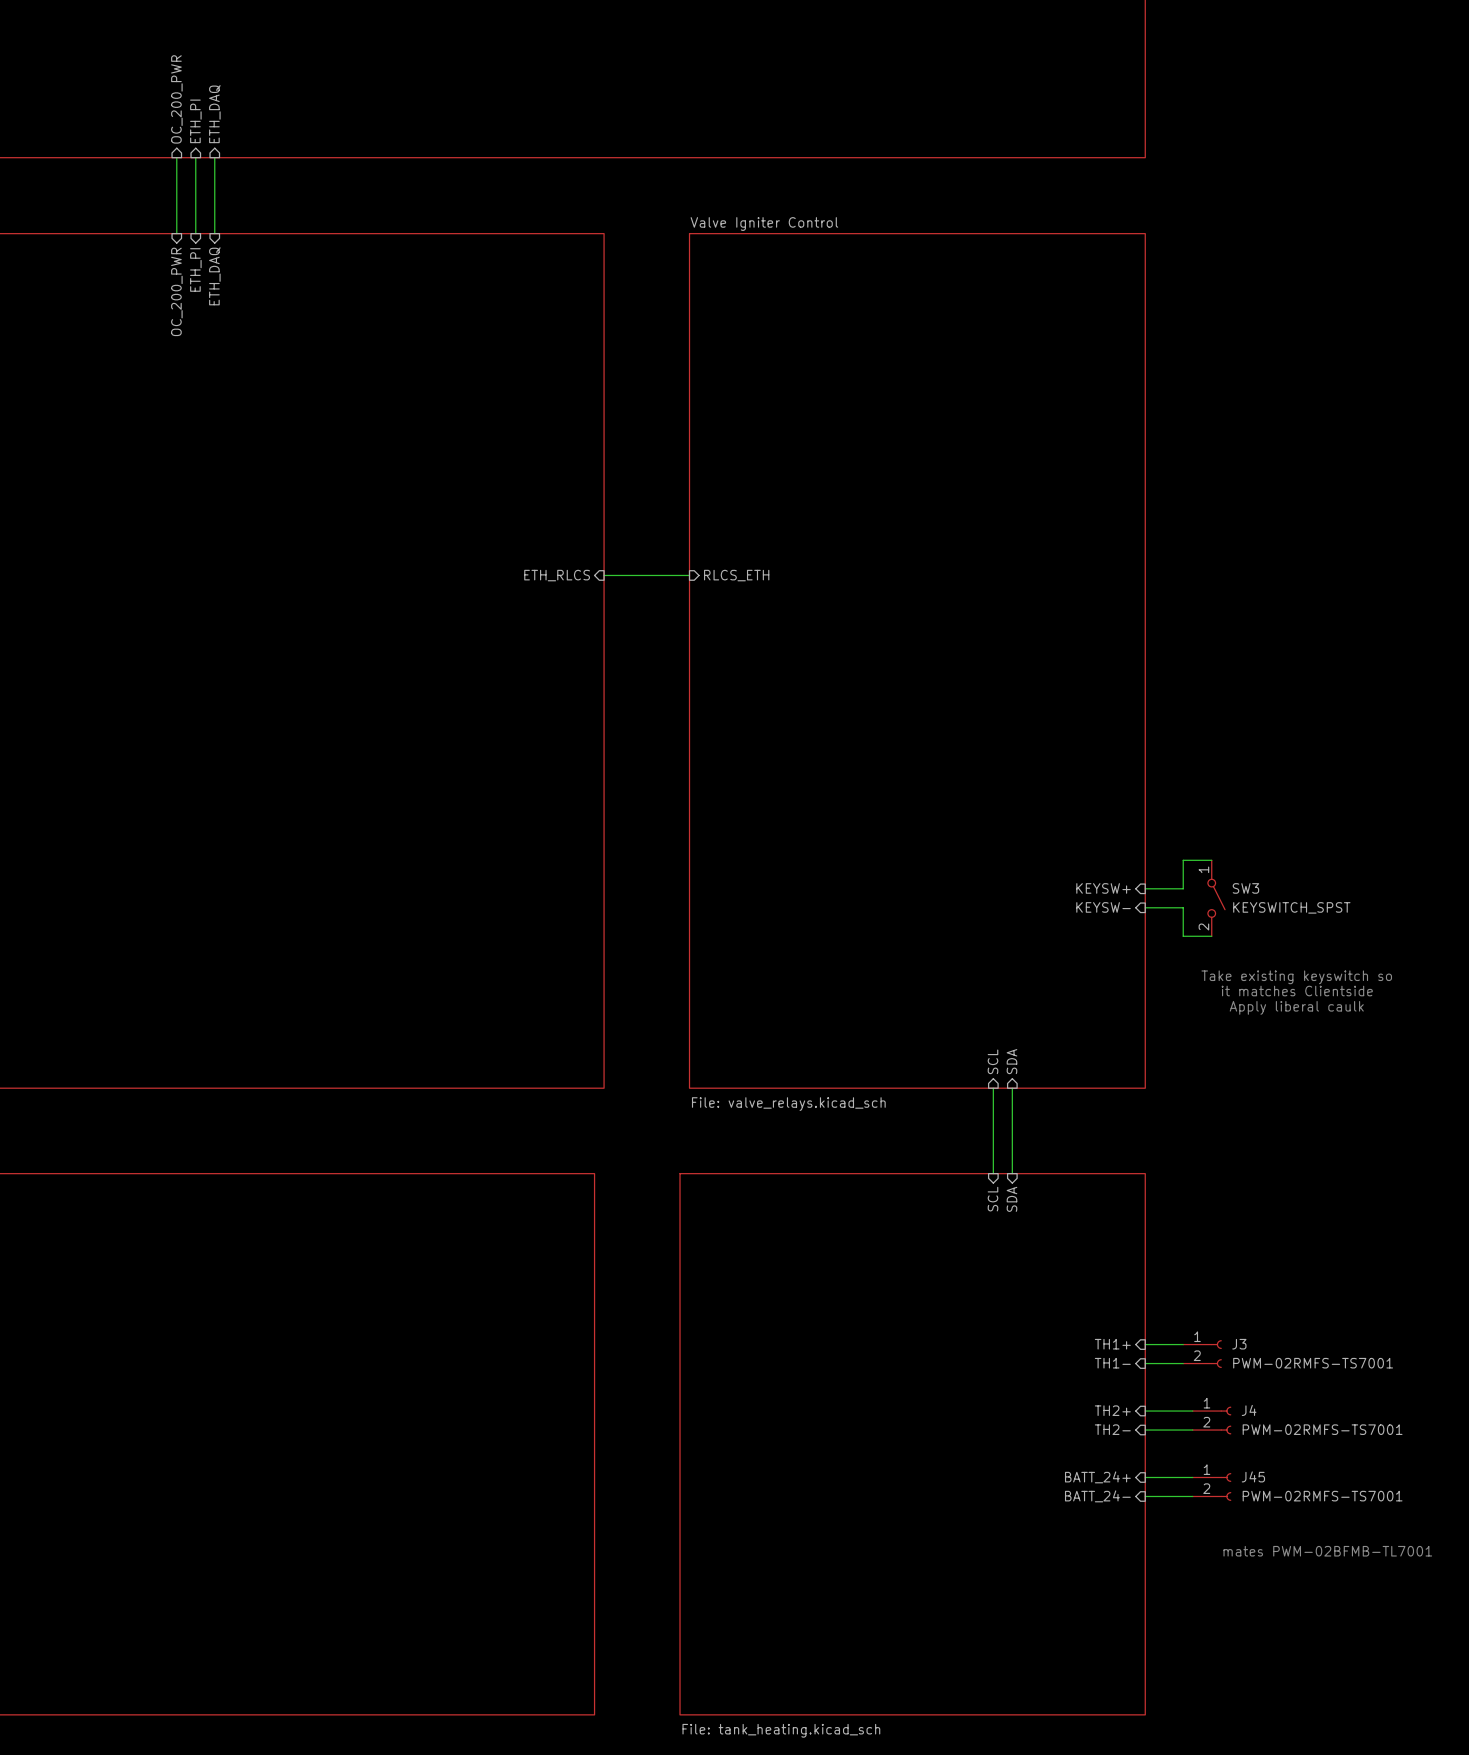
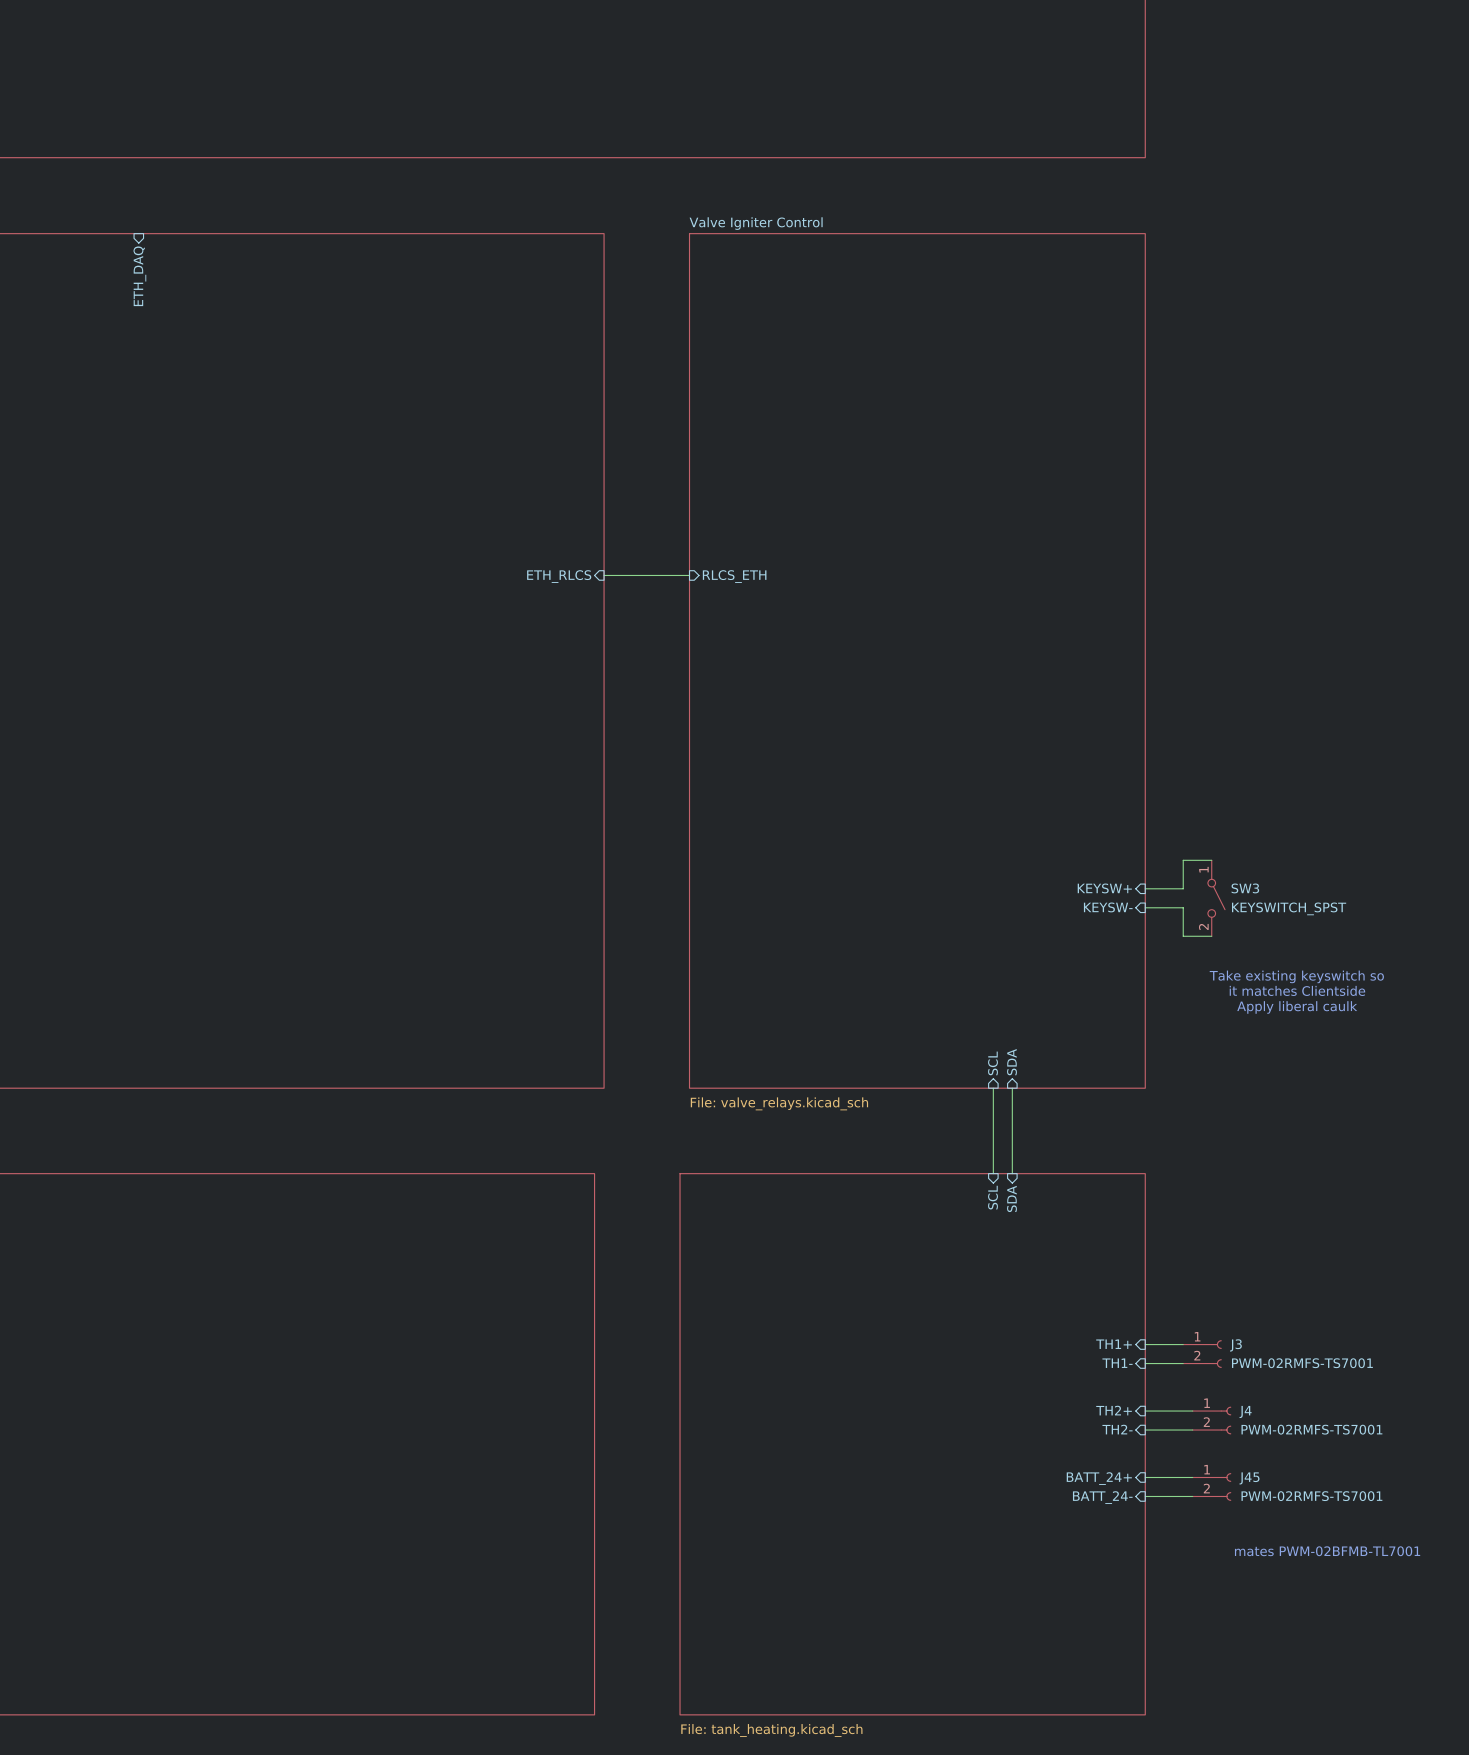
sheet pin: OC_200_PWR (176, 99) -> none
sheet pin: ETH_DAQ (214, 114) -> none
sheet pin: ETH_PI (195, 121) -> none
wire: (176, 157) (176, 233) -> none
wire: (195, 157) (195, 233) -> none
wire: (214, 157) (214, 233) -> none
sheet pin: ETH_PI (195, 269) -> none
sheet pin: none -> ETH_DAQ (139, 276)
sheet pin: ETH_DAQ (214, 276) -> none
sheet pin: OC_200_PWR (176, 291) -> none

